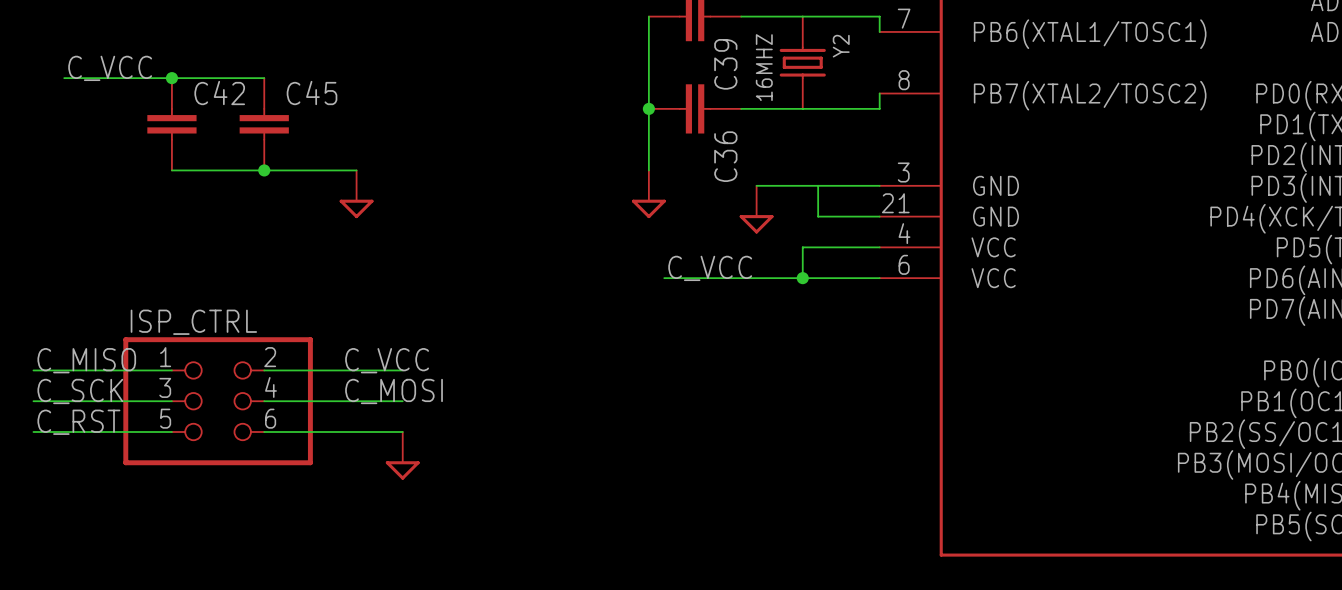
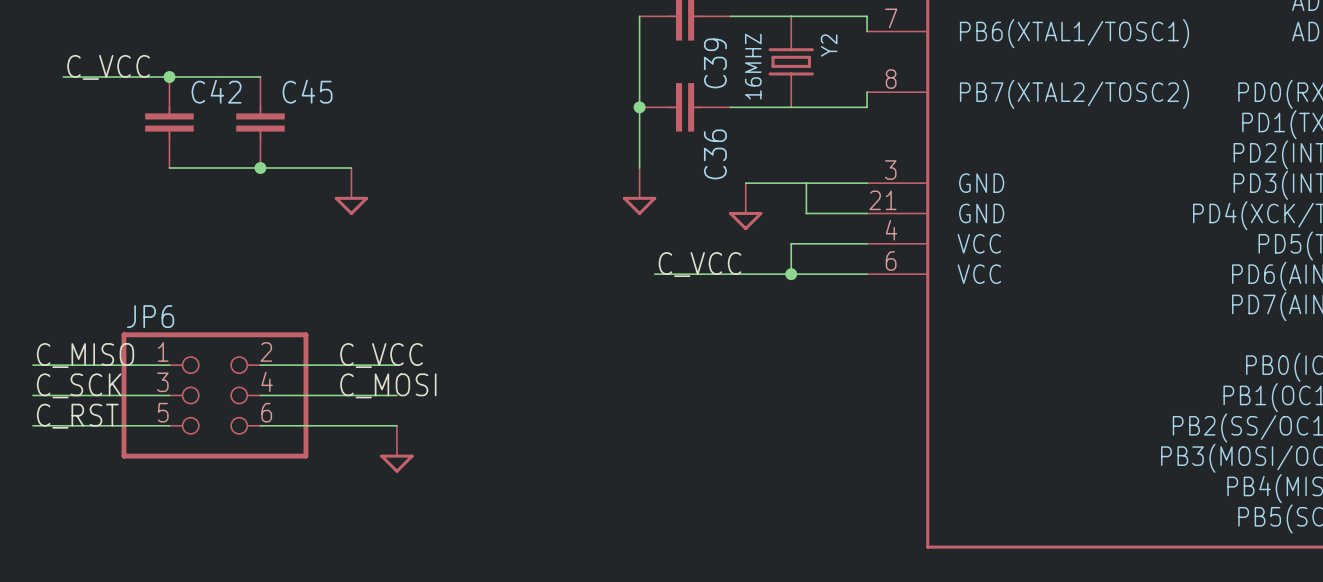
ISP_CTRL name: ISP_CTRL (193, 322) -> JP6 (150, 316)

